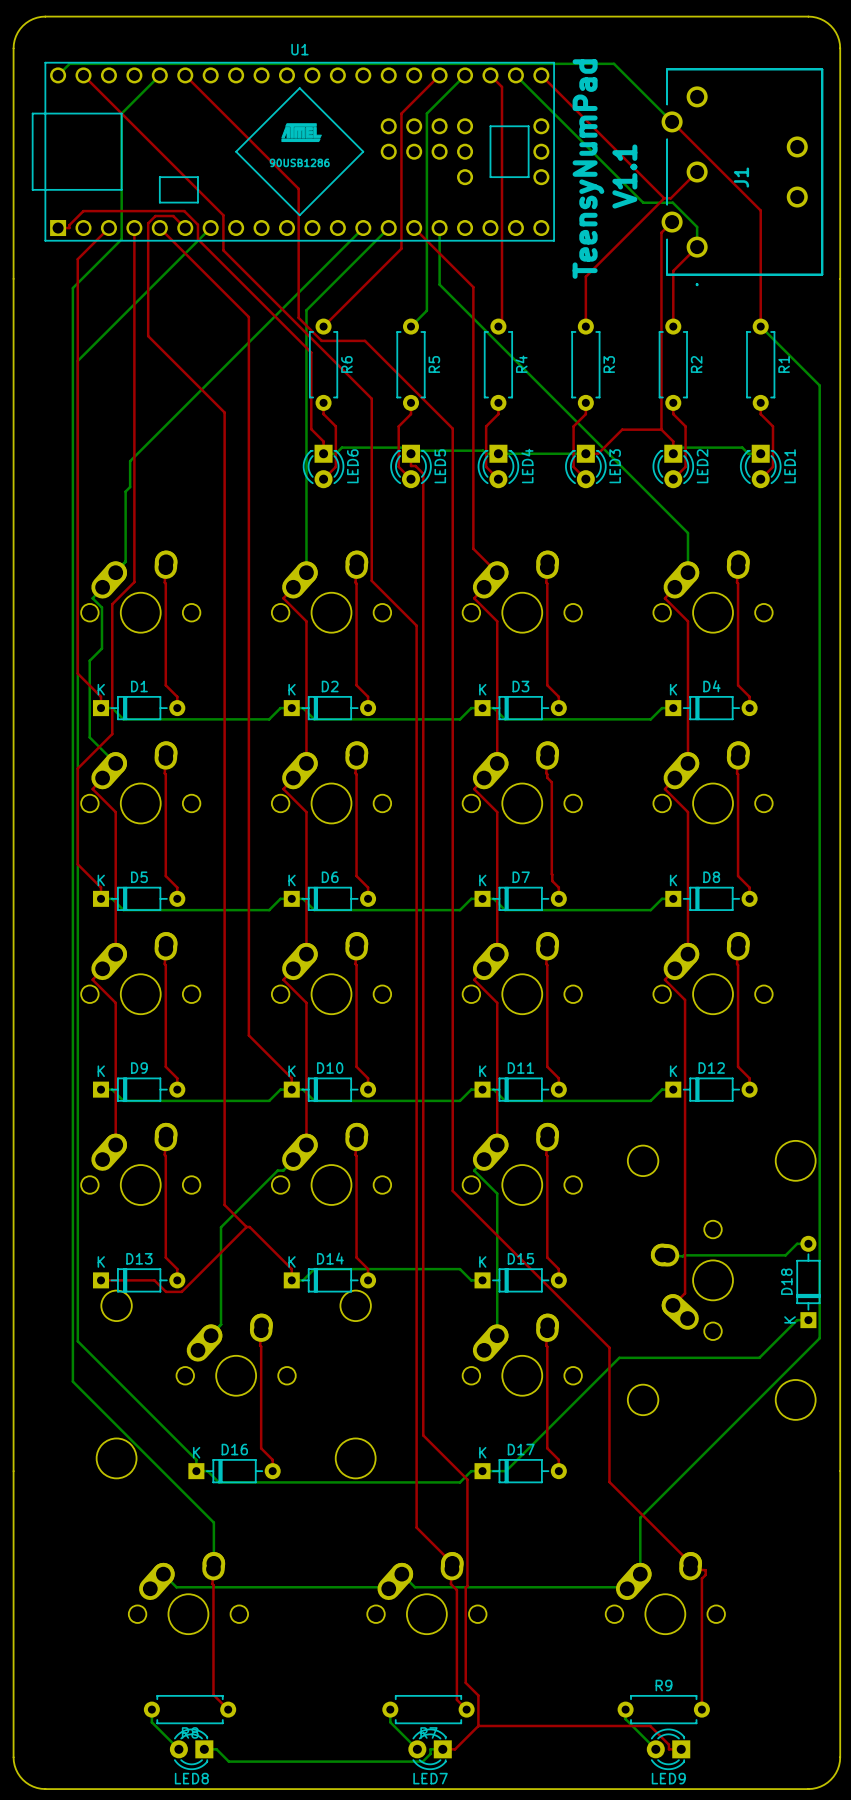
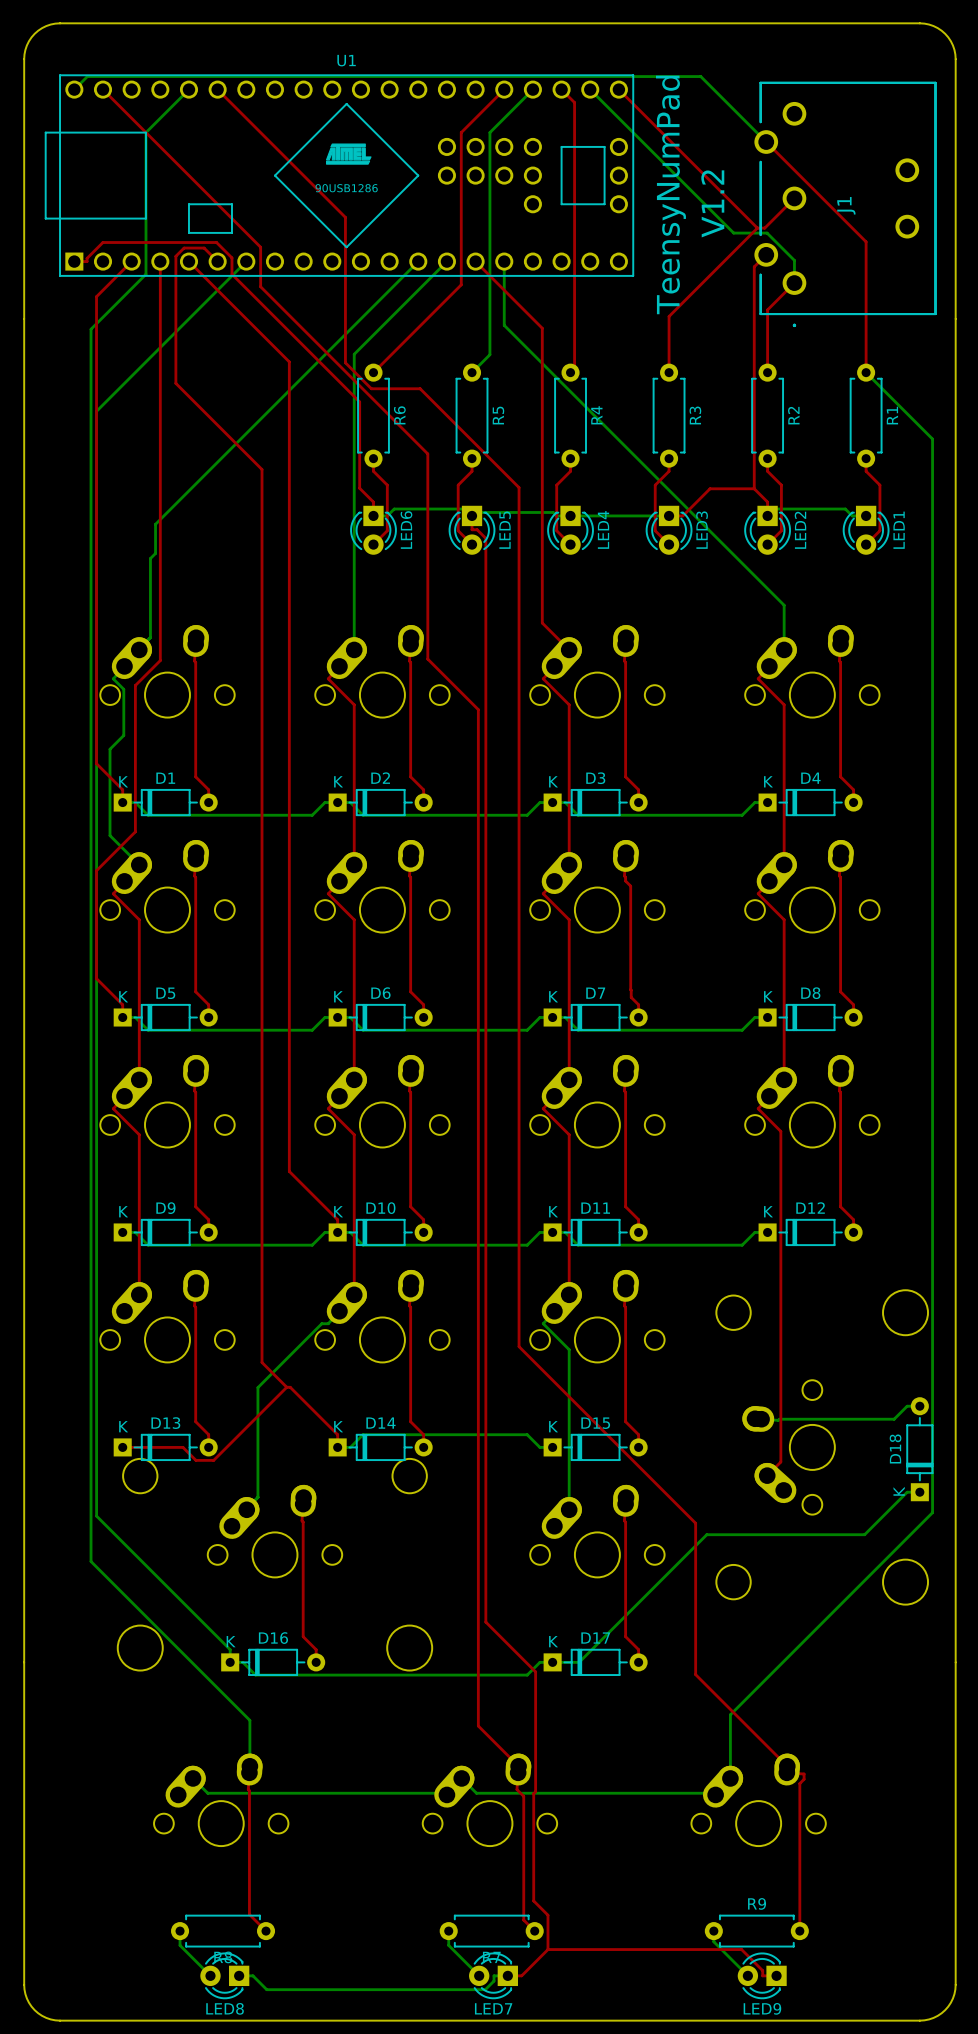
text: V1.1 (624, 176) -> V1.2 (712, 203)

